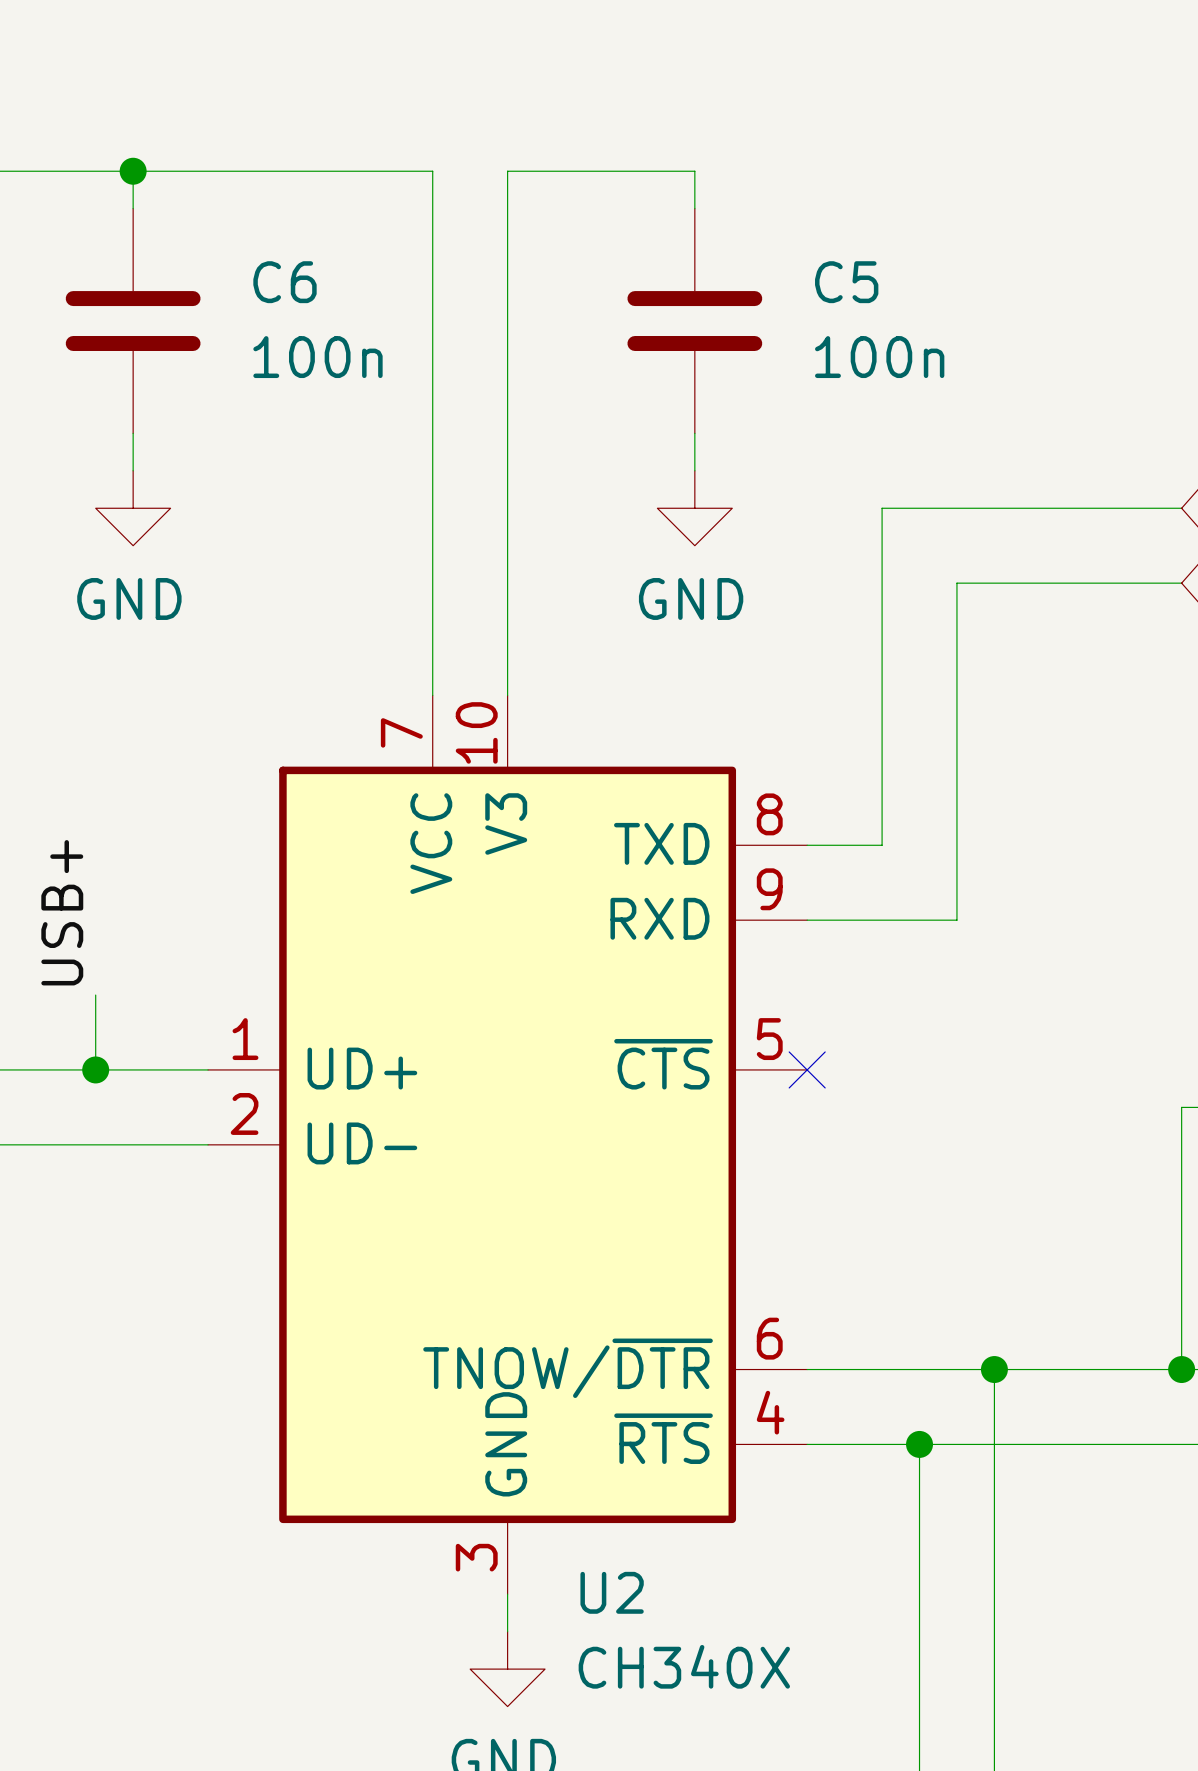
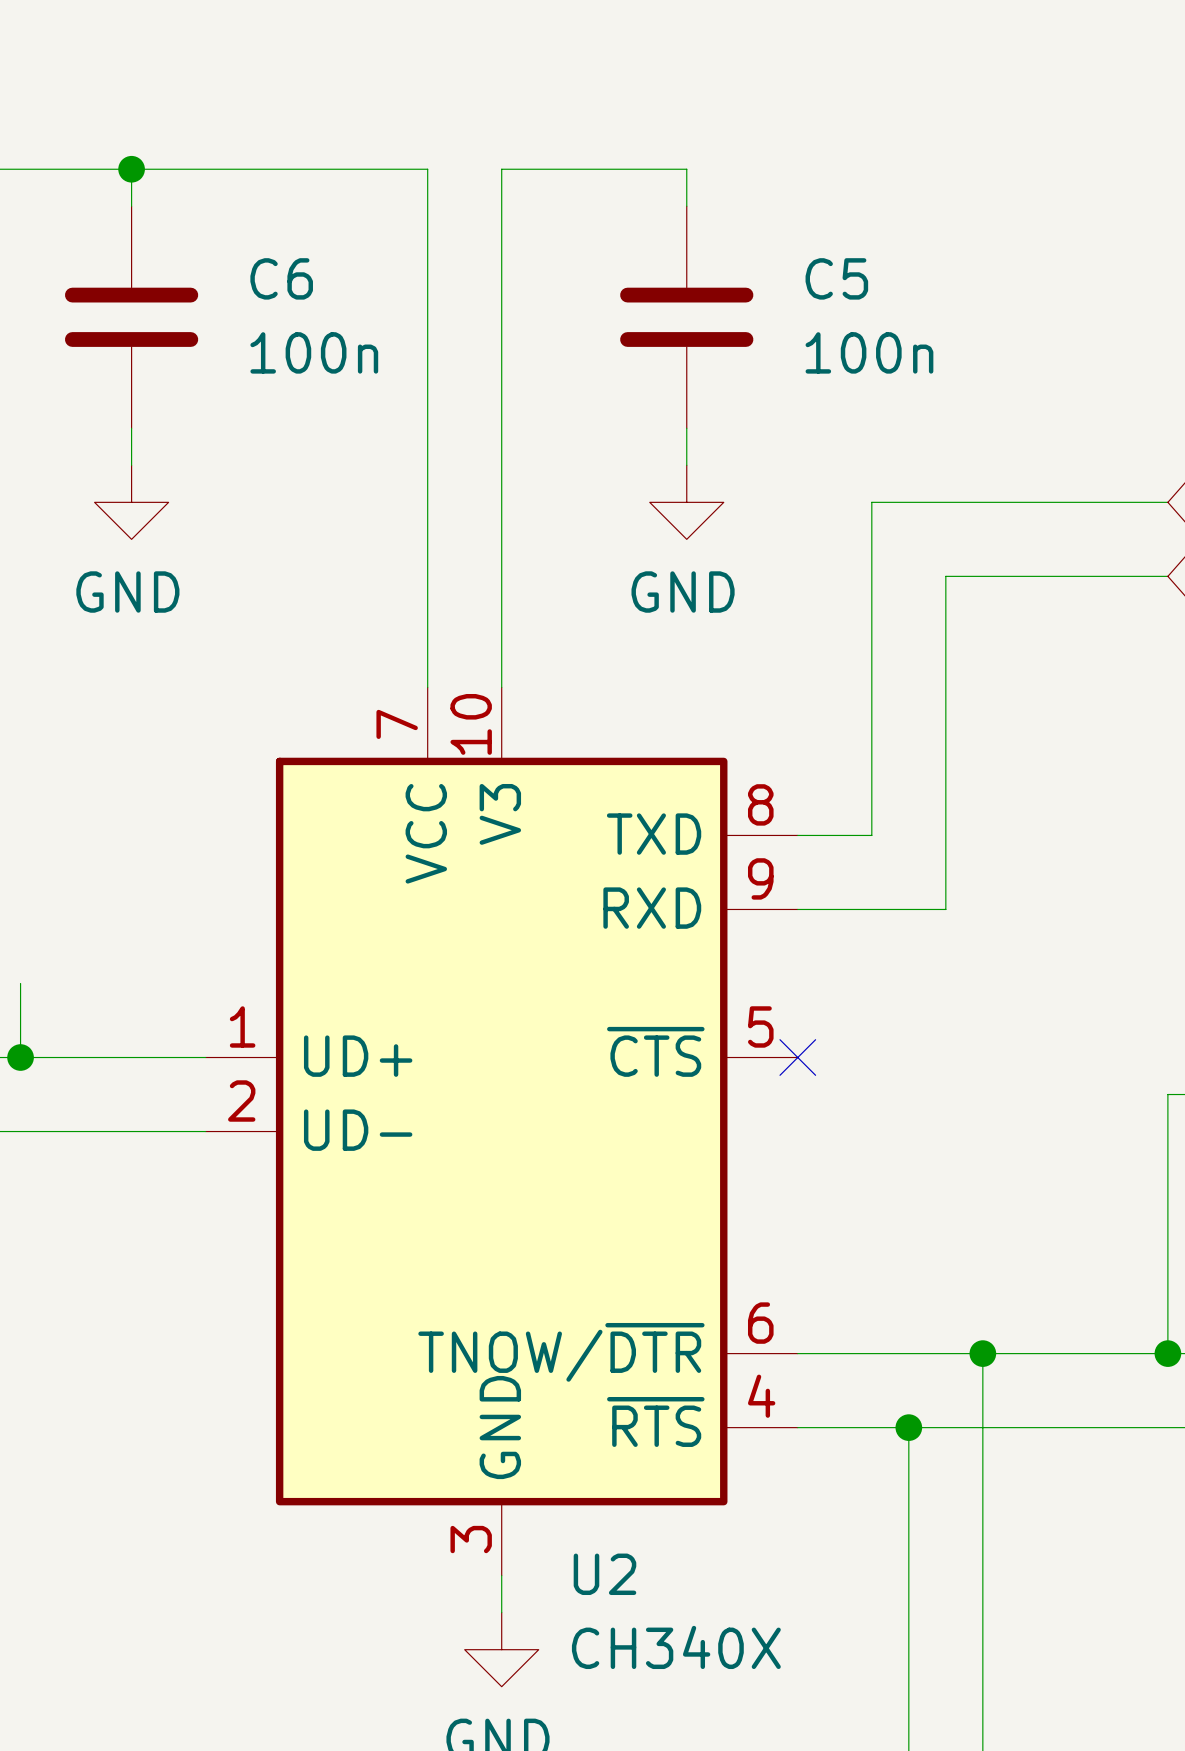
label: USB+ (62, 912) -> none
wire: (95, 995) (95, 1069) -> (20, 983) (20, 1057)
junction: none -> (20, 1057)
junction: (95, 1069) -> none

